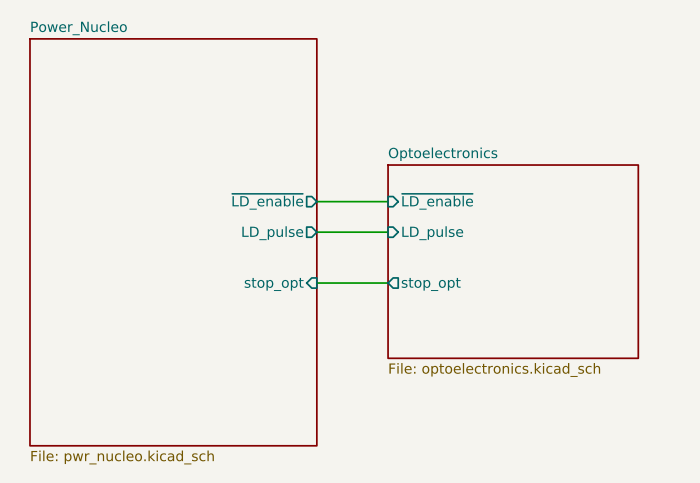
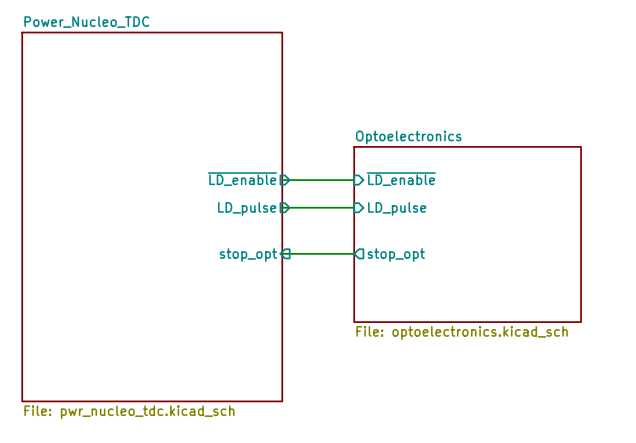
wire: none -> (282, 180) (289, 180)
wire: none -> (282, 207) (289, 207)
sheet Power_Nucleo_TDC: none -> File: pwr_nucleo_tdc.kicad_sch (152, 216)
sheet Power_Nucleo: File: pwr_nucleo.kicad_sch (173, 242) -> none
wire: none -> (282, 253) (289, 253)

